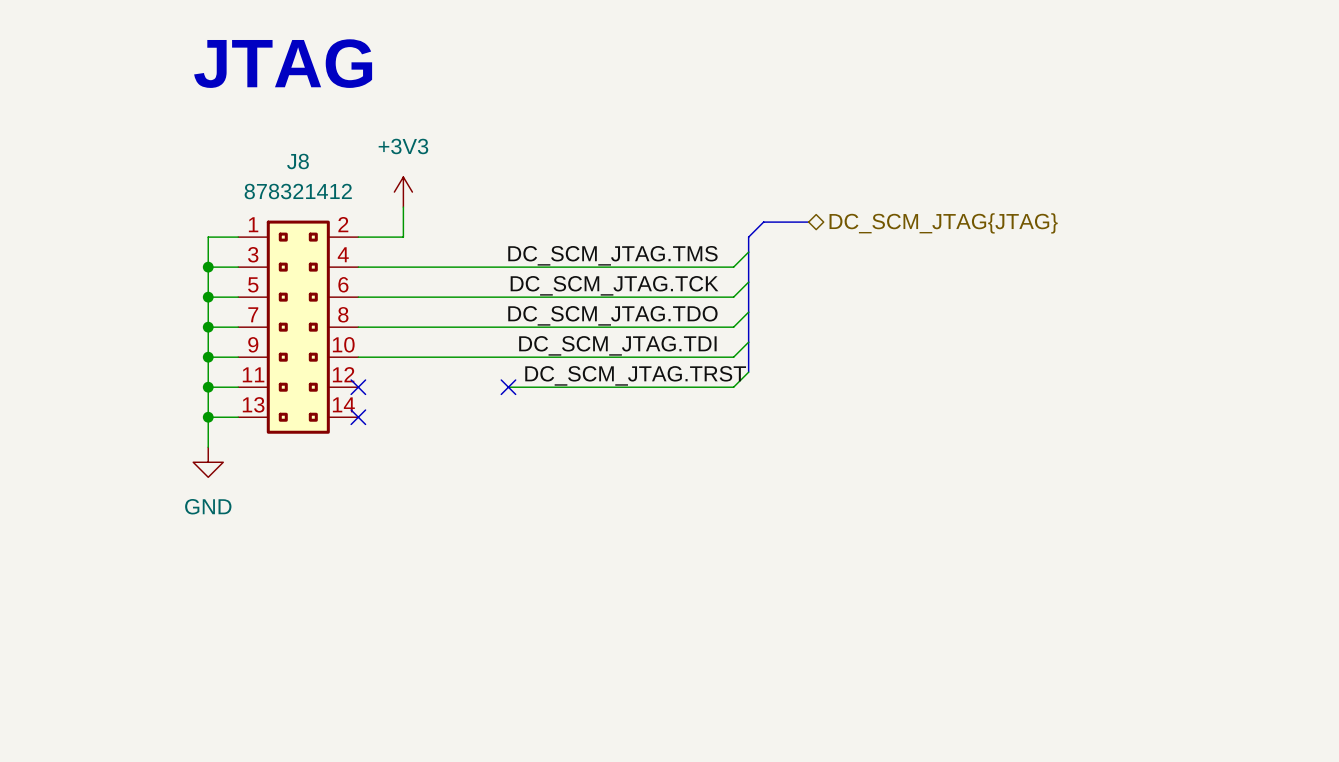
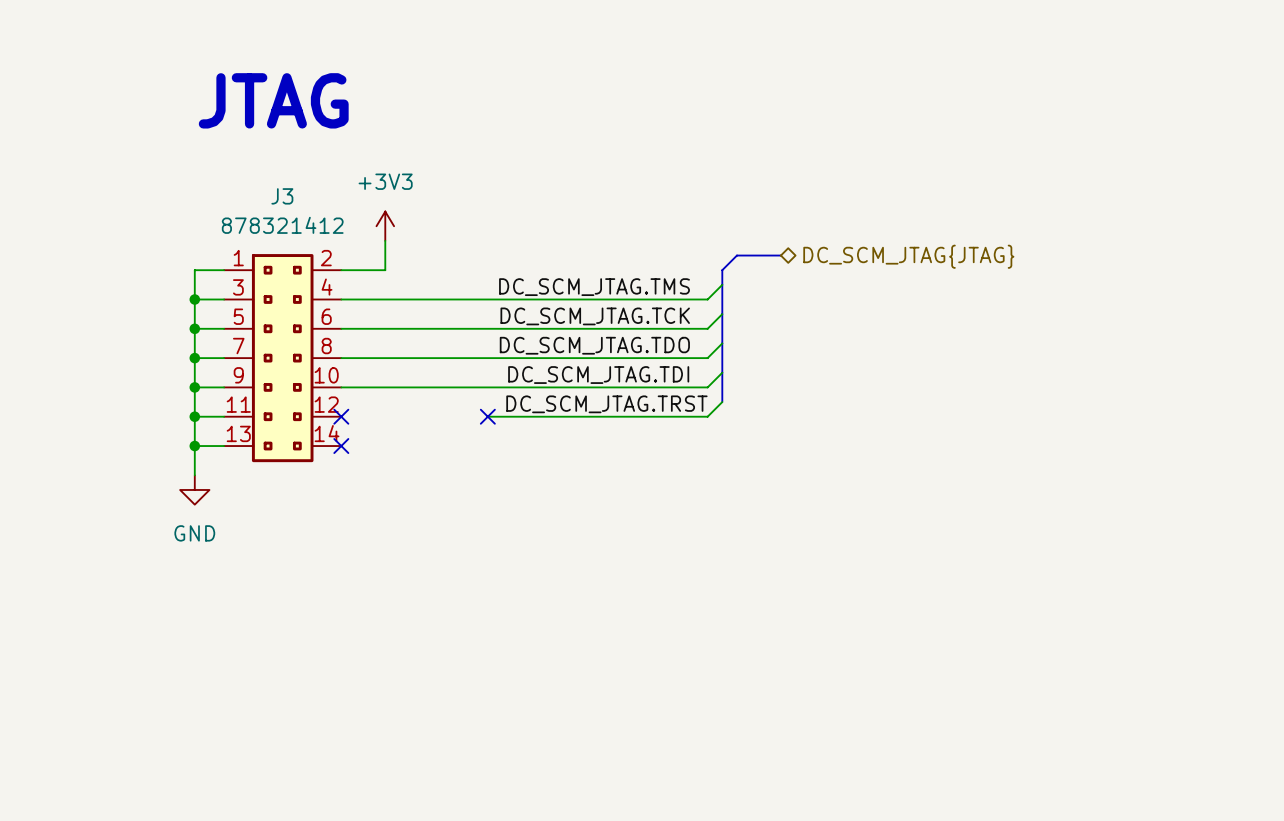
J8 name: J8 (298, 161) -> J3 (282, 196)

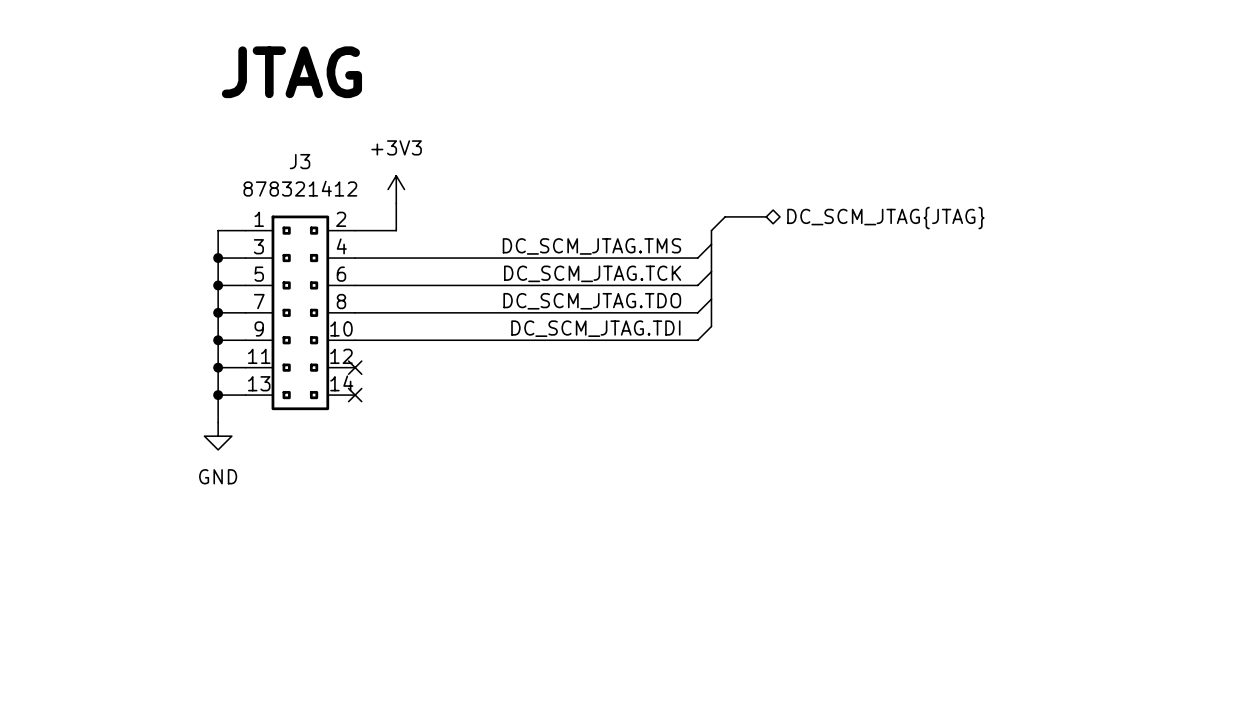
bus: (722, 372) (722, 402) -> none
wire: (722, 402) (707, 416) (487, 416) -> none
label: DC_SCM_JTAG.TRST (606, 404) -> none
no-connect mark: (487, 416) -> none

